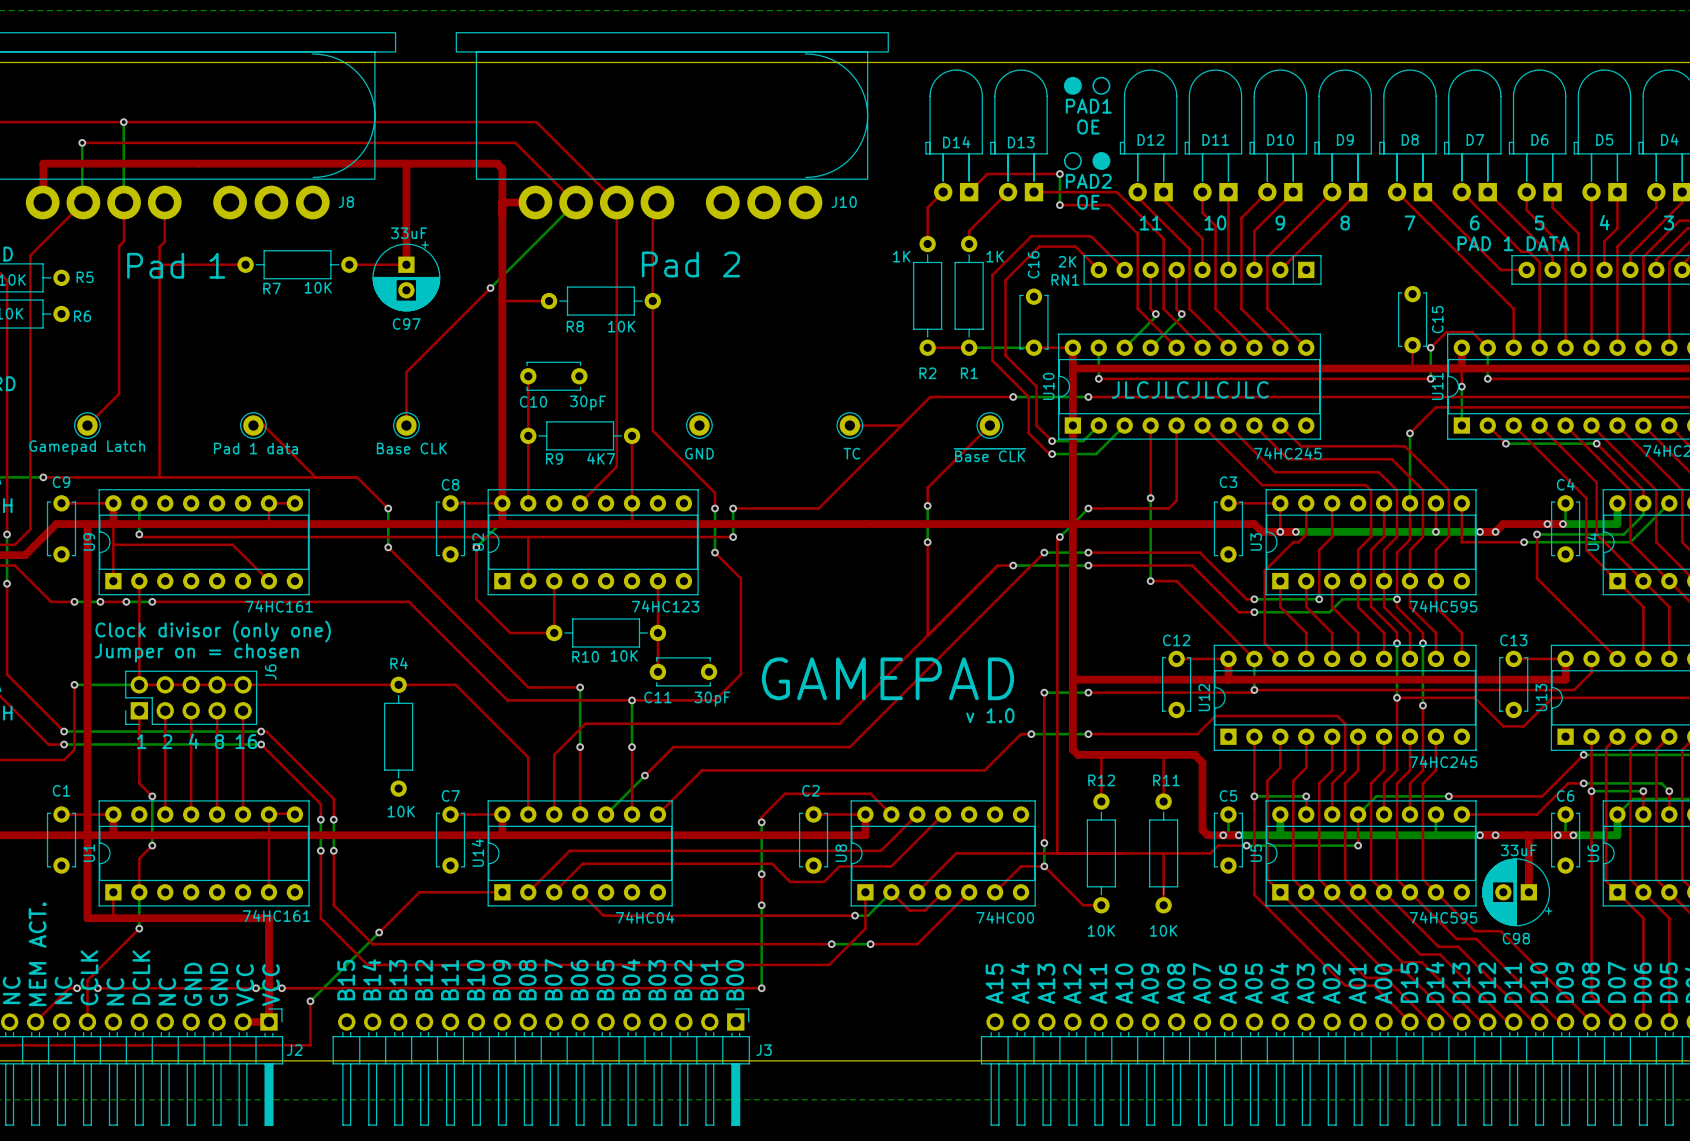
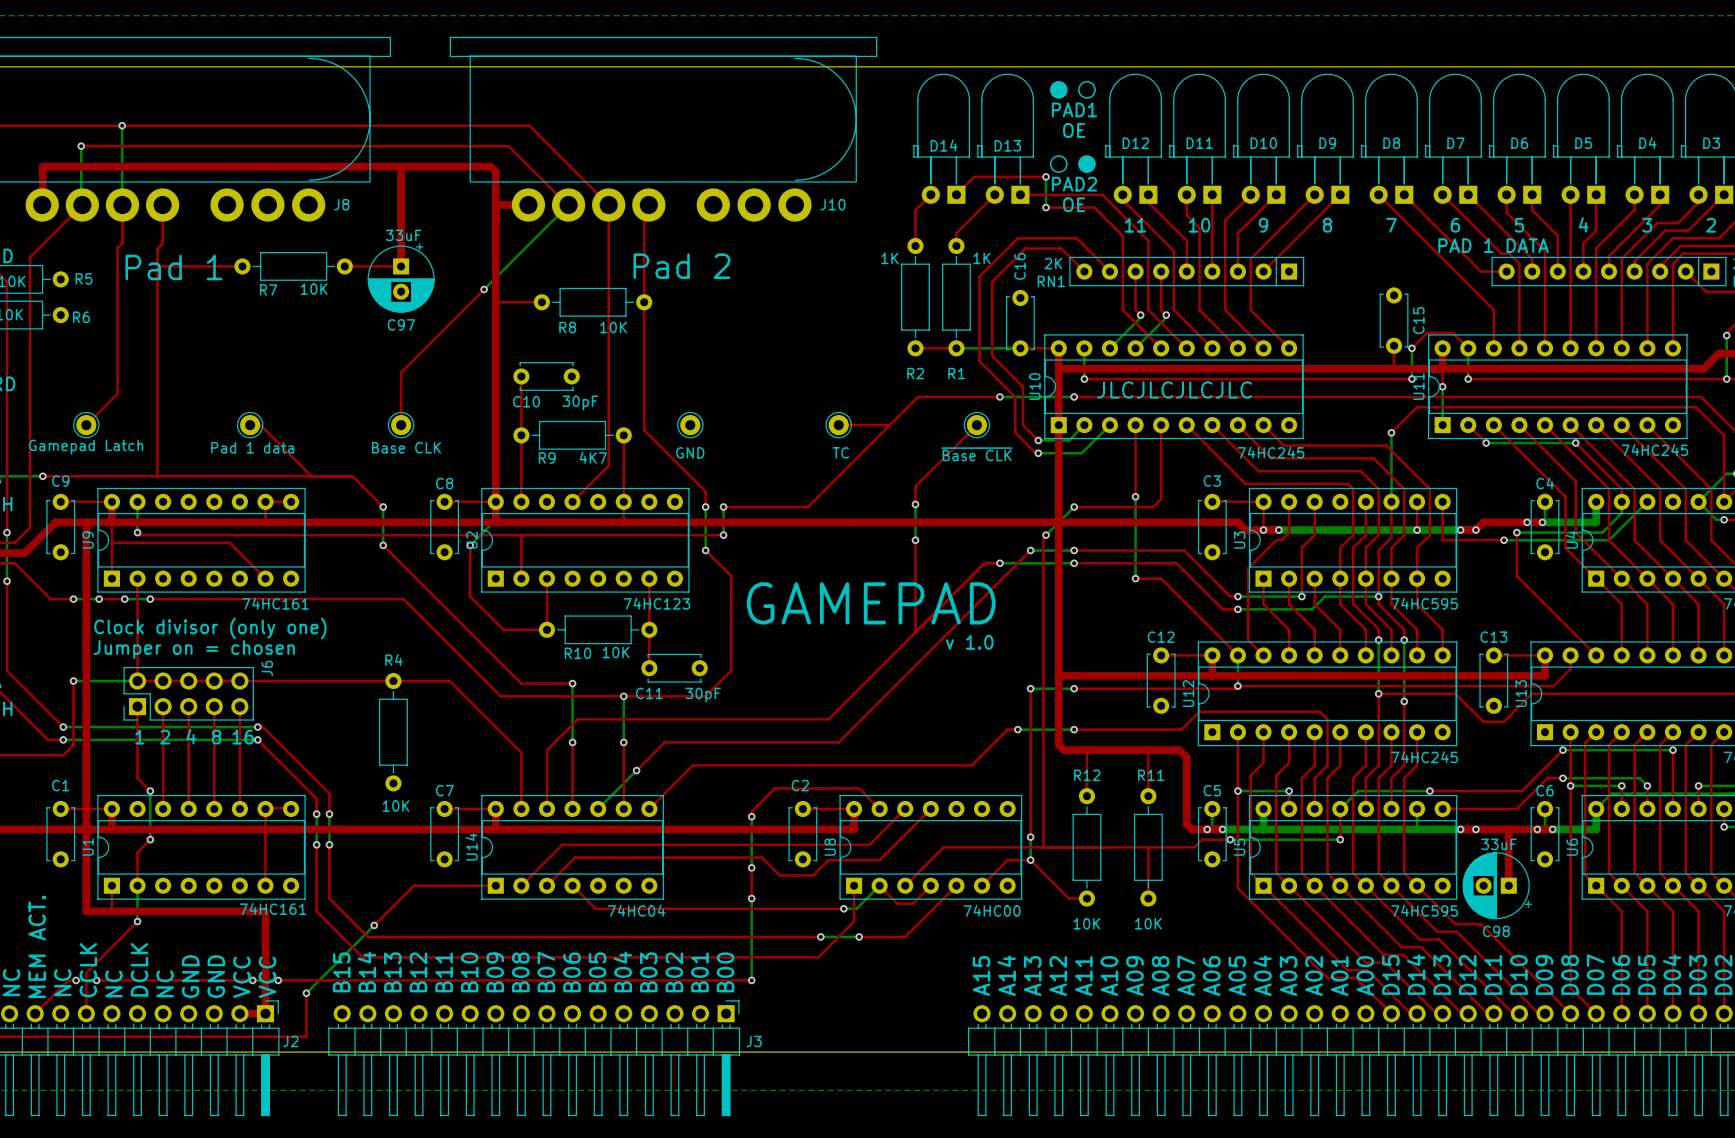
text position: GAMEPAD (887, 678) -> GAMEPAD (871, 603)
text position: v 1.0 (990, 715) -> v 1.0 (969, 642)

